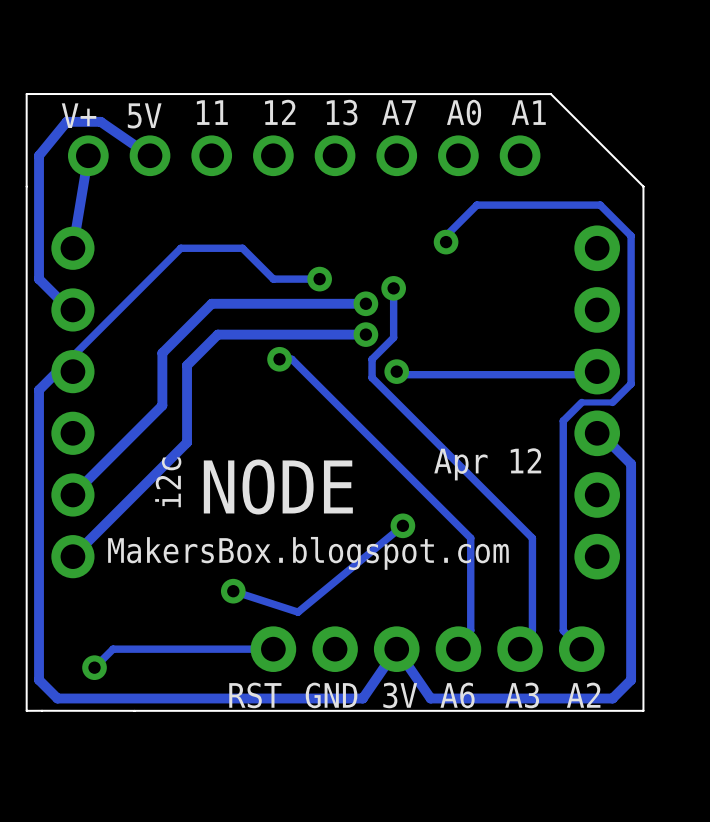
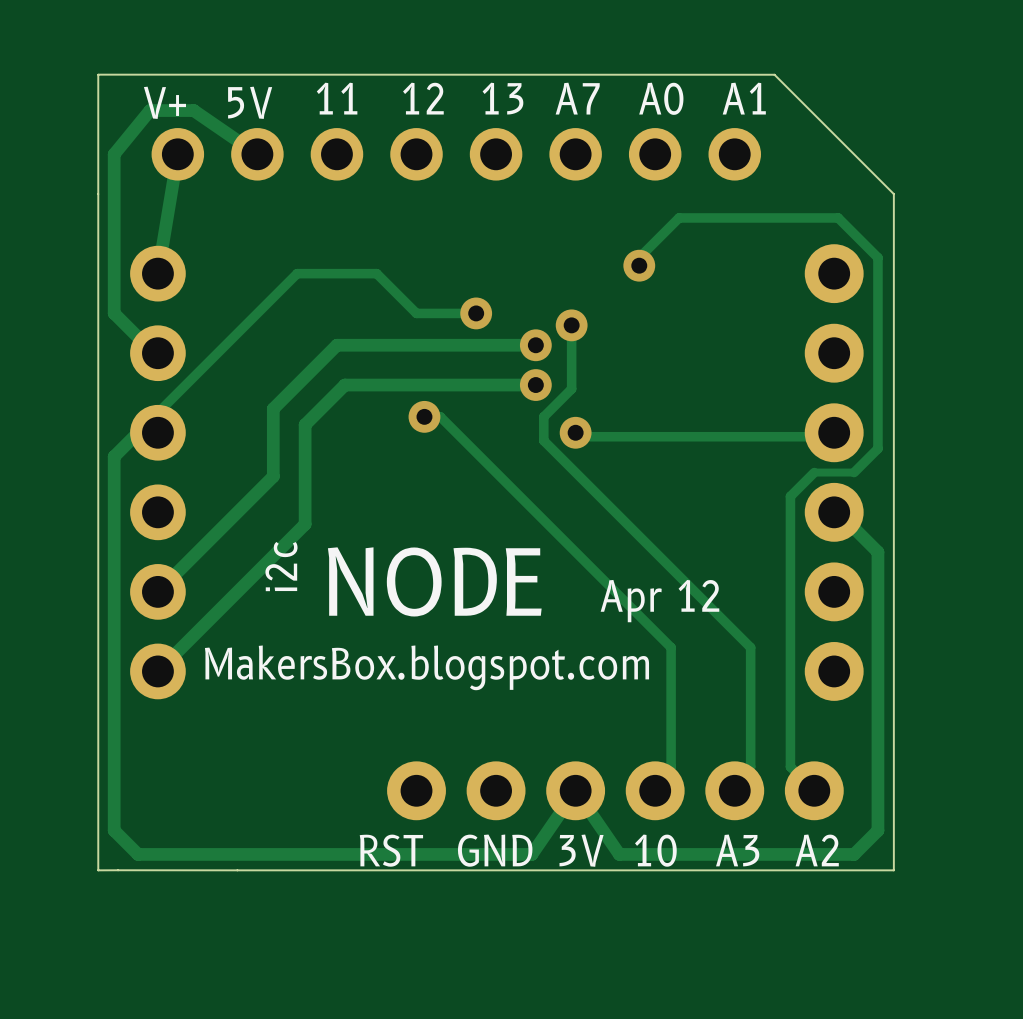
text position: Apr 12 (487, 464) -> Apr 12 (659, 601)
track: (402, 525) (298, 612) (233, 591) -> none
via: (402, 525) -> none
via: (233, 591) -> none
track: (273, 649) (113, 649) (94, 667) -> none
via: (94, 667) -> none
text: A6 (457, 695) -> 10 (655, 850)

